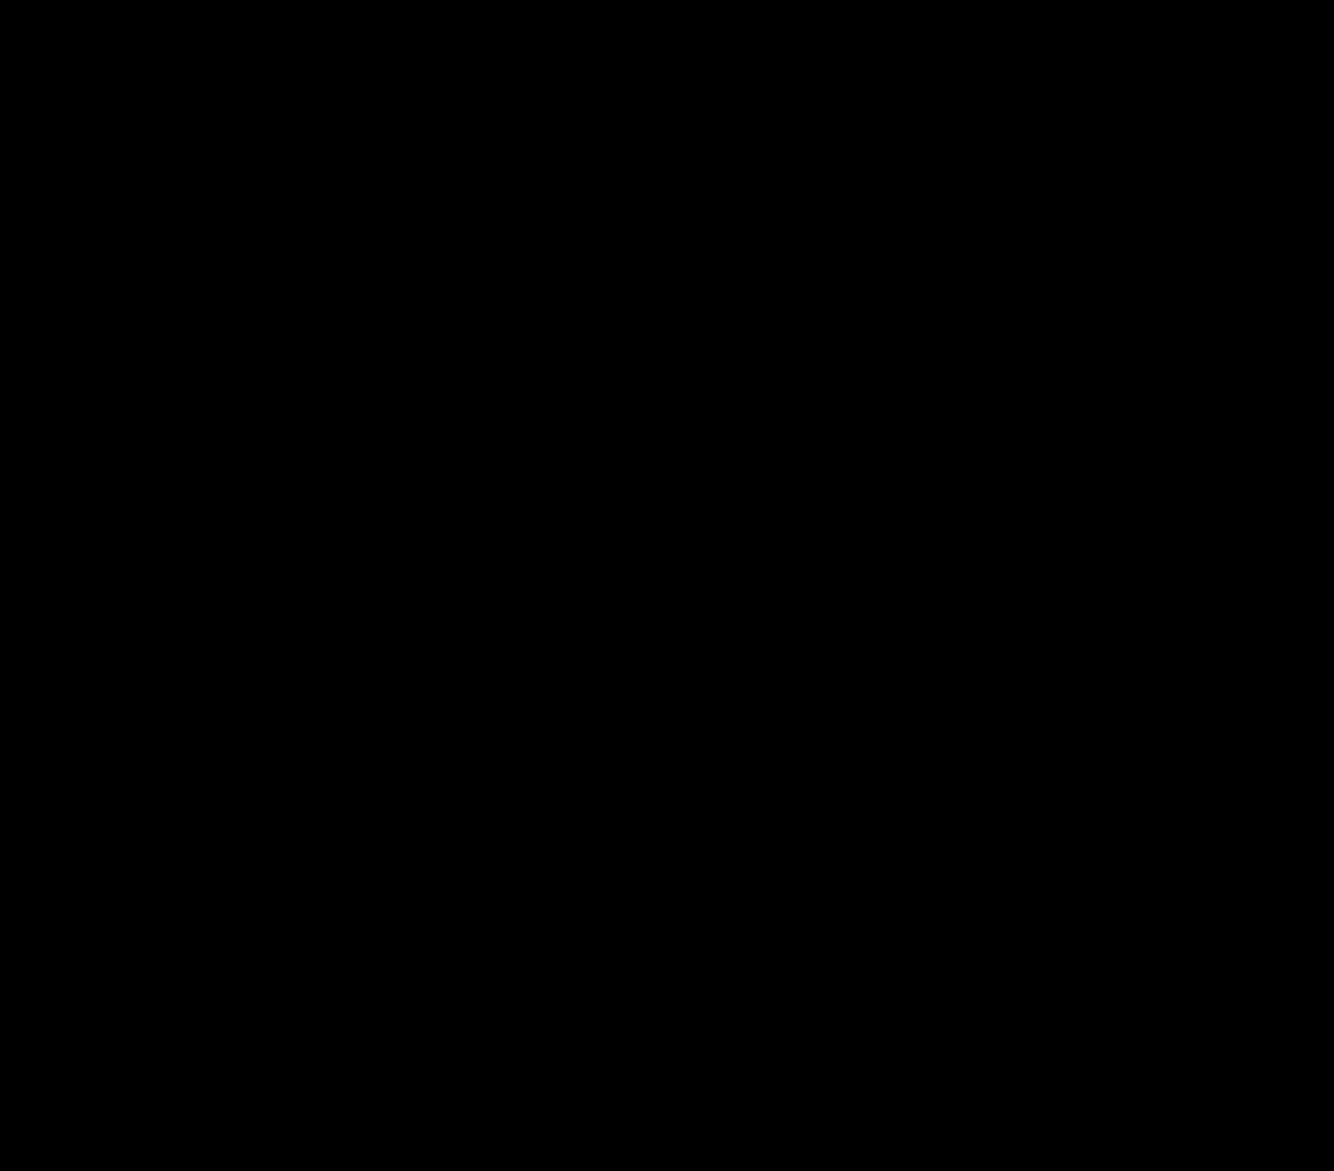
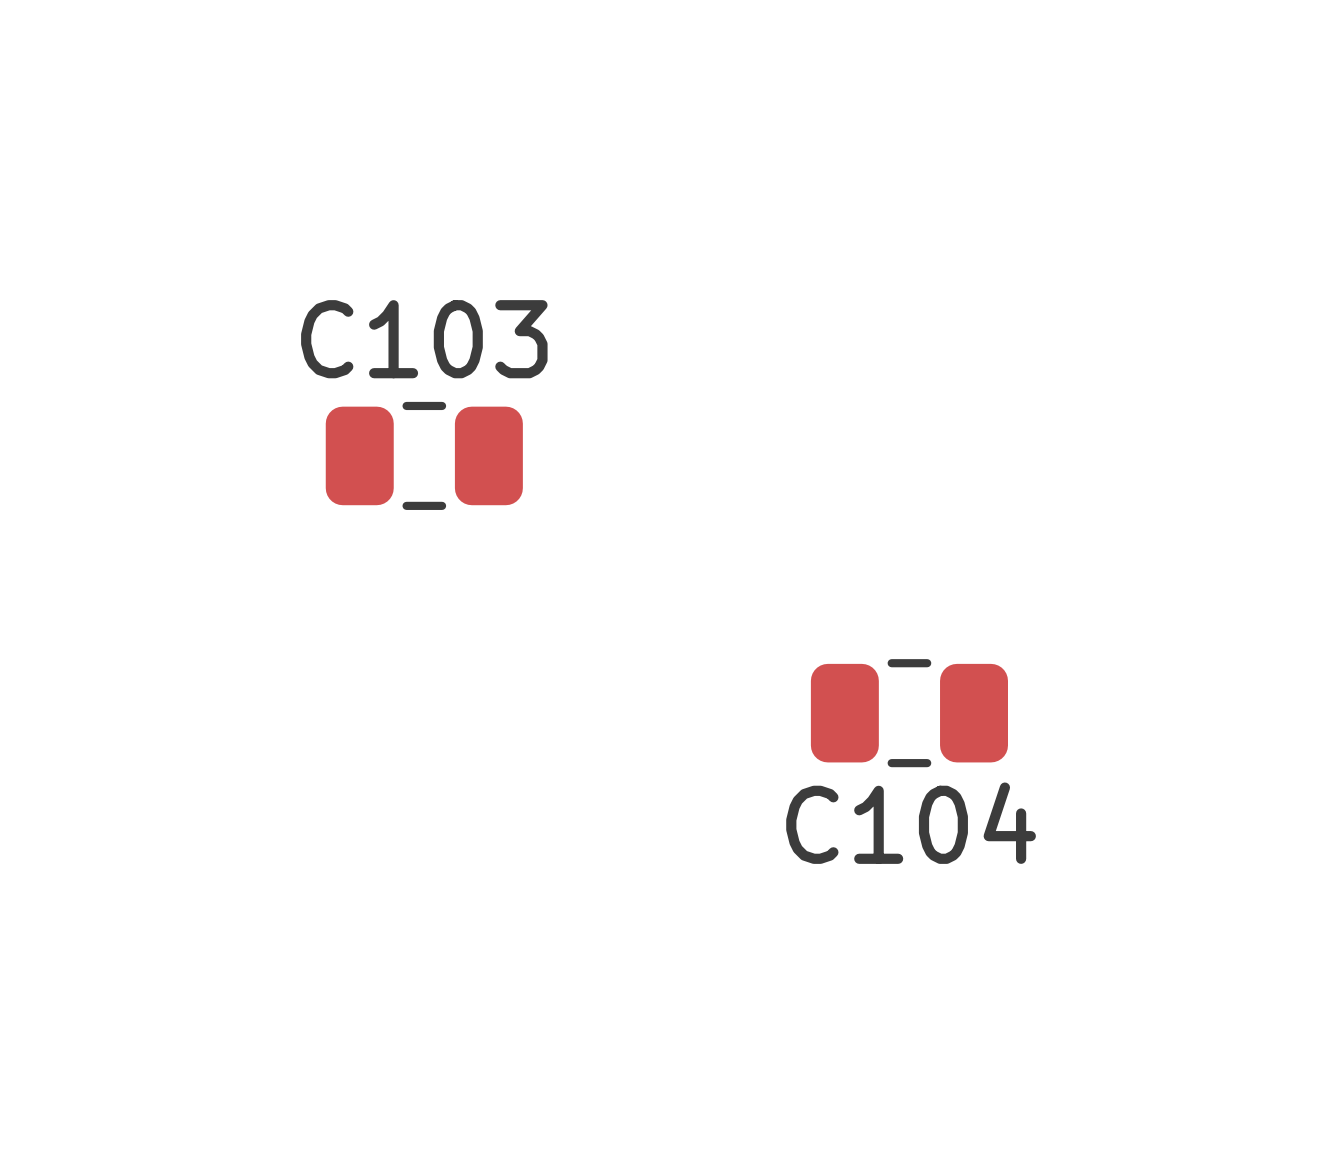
C103: none -> (424, 455)
C104: none -> (909, 713)

